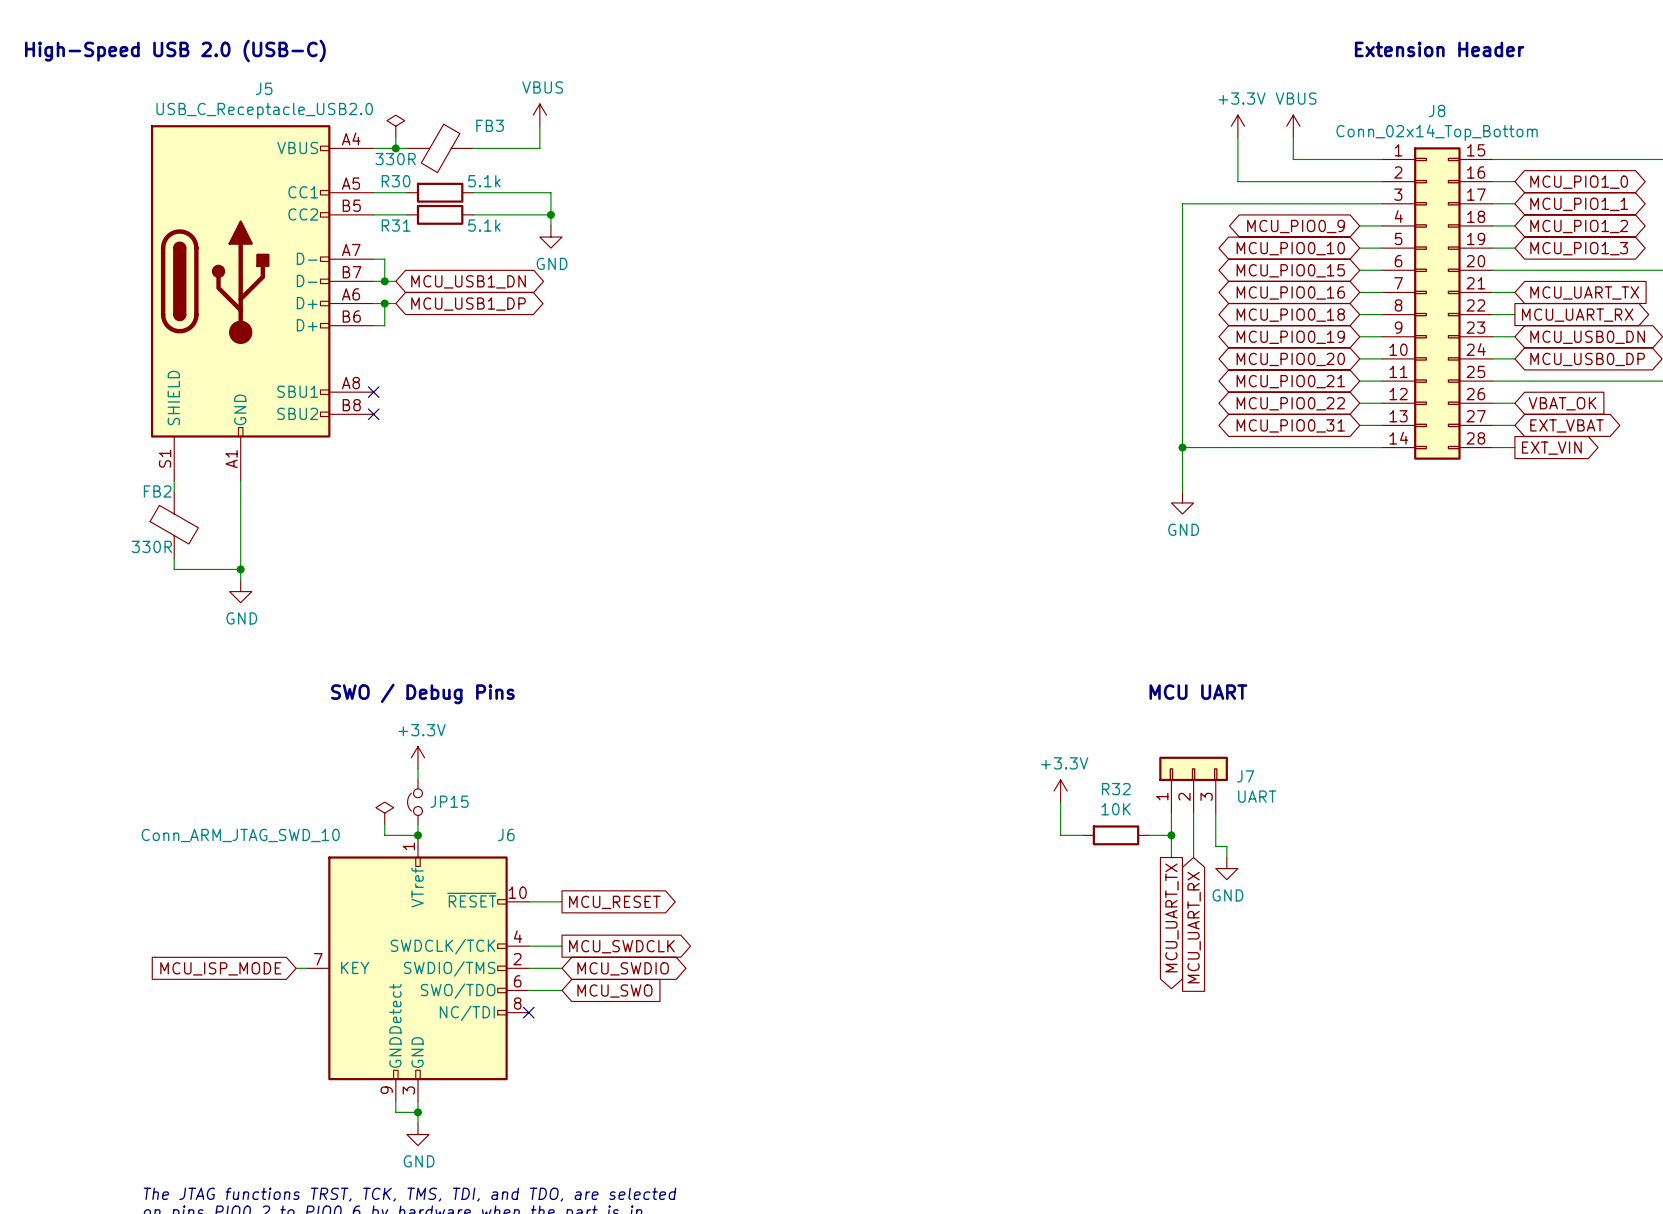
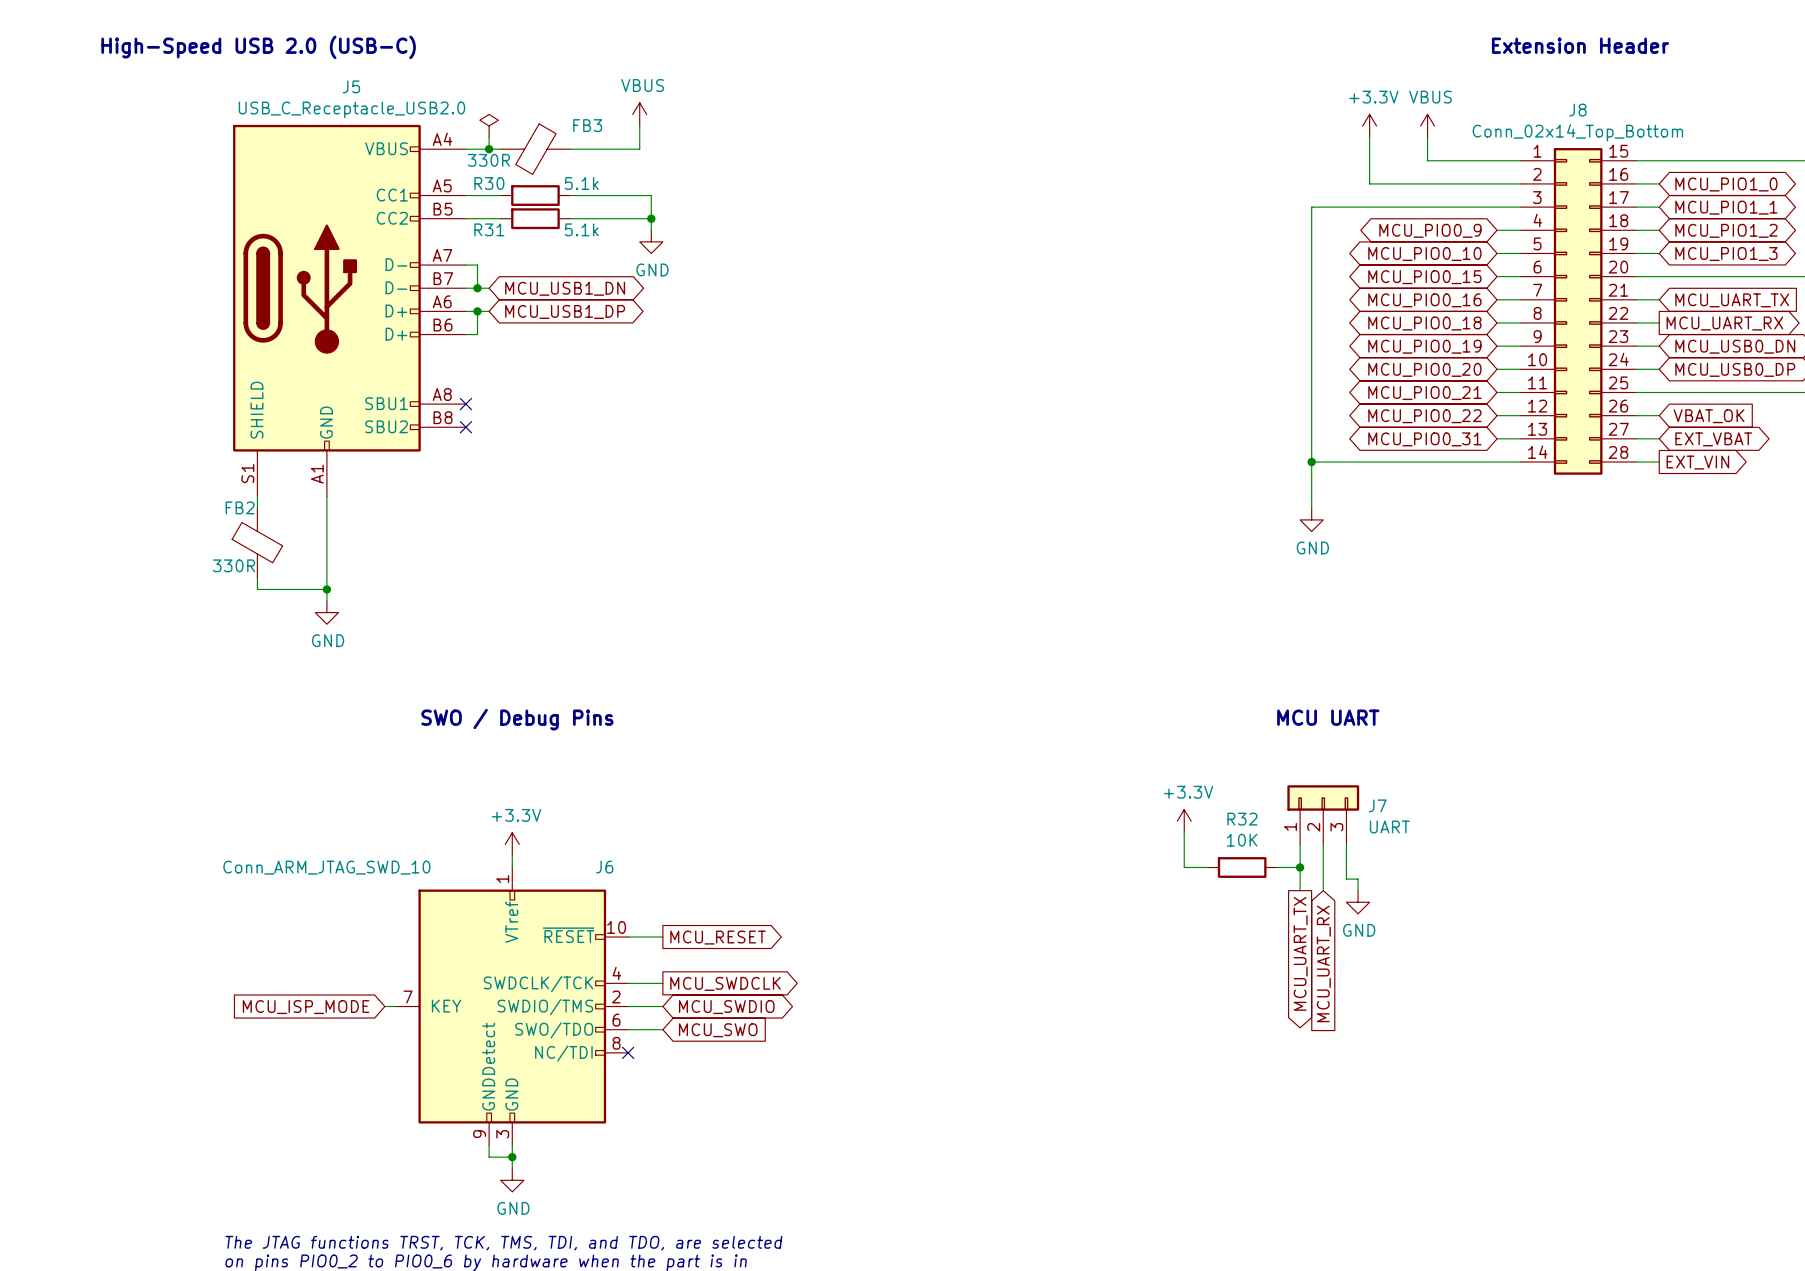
power symbol position: +3.3V (417, 757) -> +3.3V (512, 844)
wire: (417, 768) (417, 779) -> none
JP15: (414, 802) -> none
power symbol: (384, 813) -> none
wire: (384, 824) (384, 835) (417, 835) -> none
junction: (417, 835) -> none

